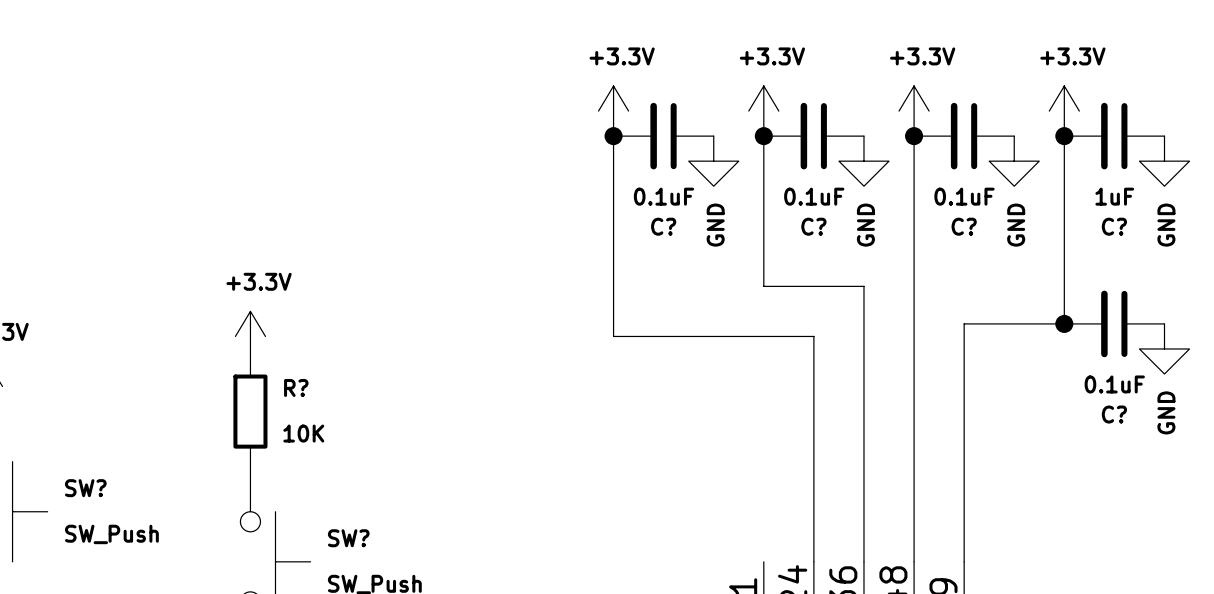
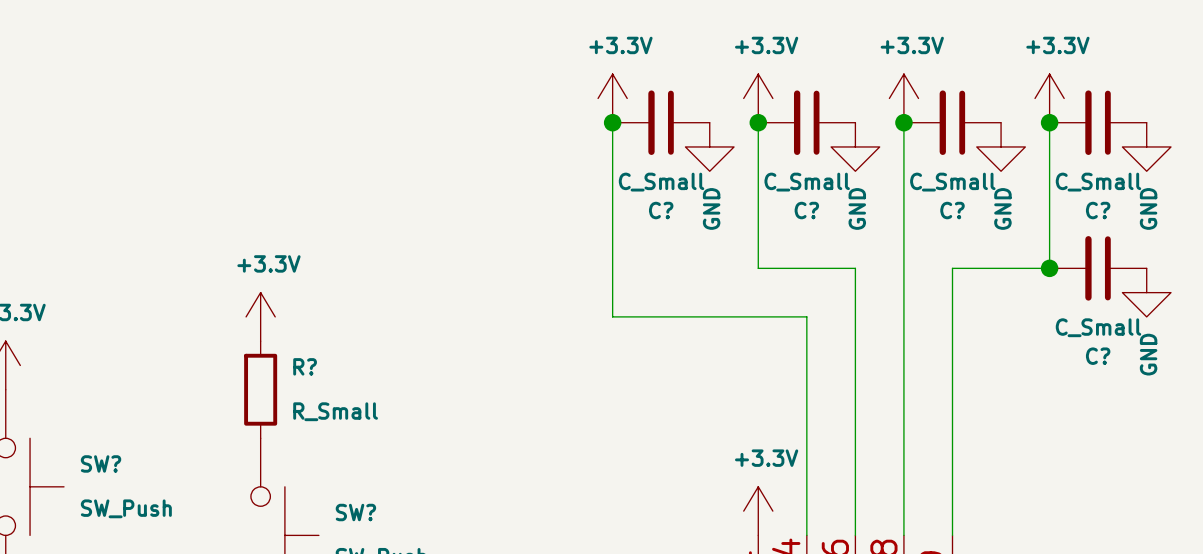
C? value: 0.1uF (664, 196) -> C_Small (661, 182)
C? value: 0.1uF (814, 196) -> C_Small (807, 182)
C? value: 0.1uF (964, 196) -> C_Small (952, 182)
C? value: 1uF (1114, 196) -> C_Small (1098, 182)
wire: (1064, 286) (1064, 323) (964, 323) -> (1049, 268) (952, 268) (952, 304)
C?: none -> C_Small (1098, 268)
junction position: (1064, 323) -> (1049, 268)
C?: 0.1uF (1114, 323) -> none
power symbol position: GND (1164, 348) -> GND (1146, 292)
R? value: 10K (303, 433) -> R_Small (335, 411)
power symbol: none -> +3.3V (758, 511)

